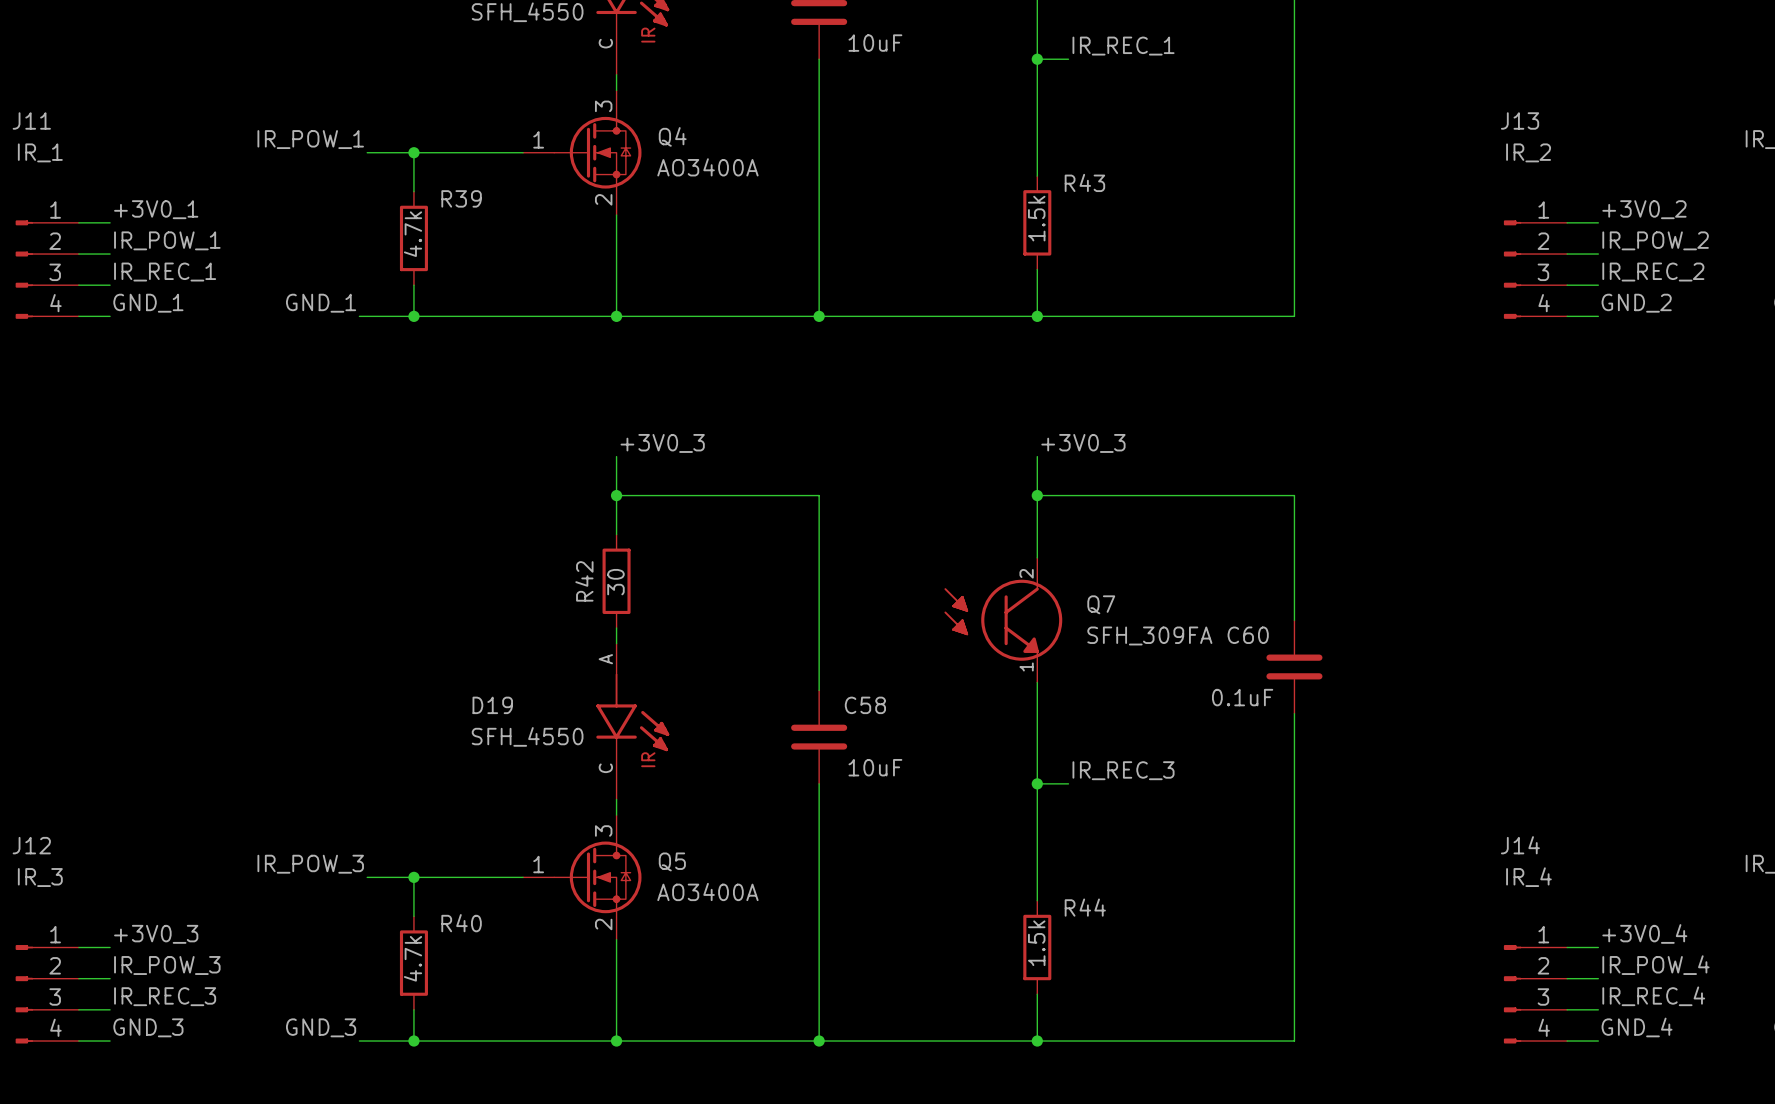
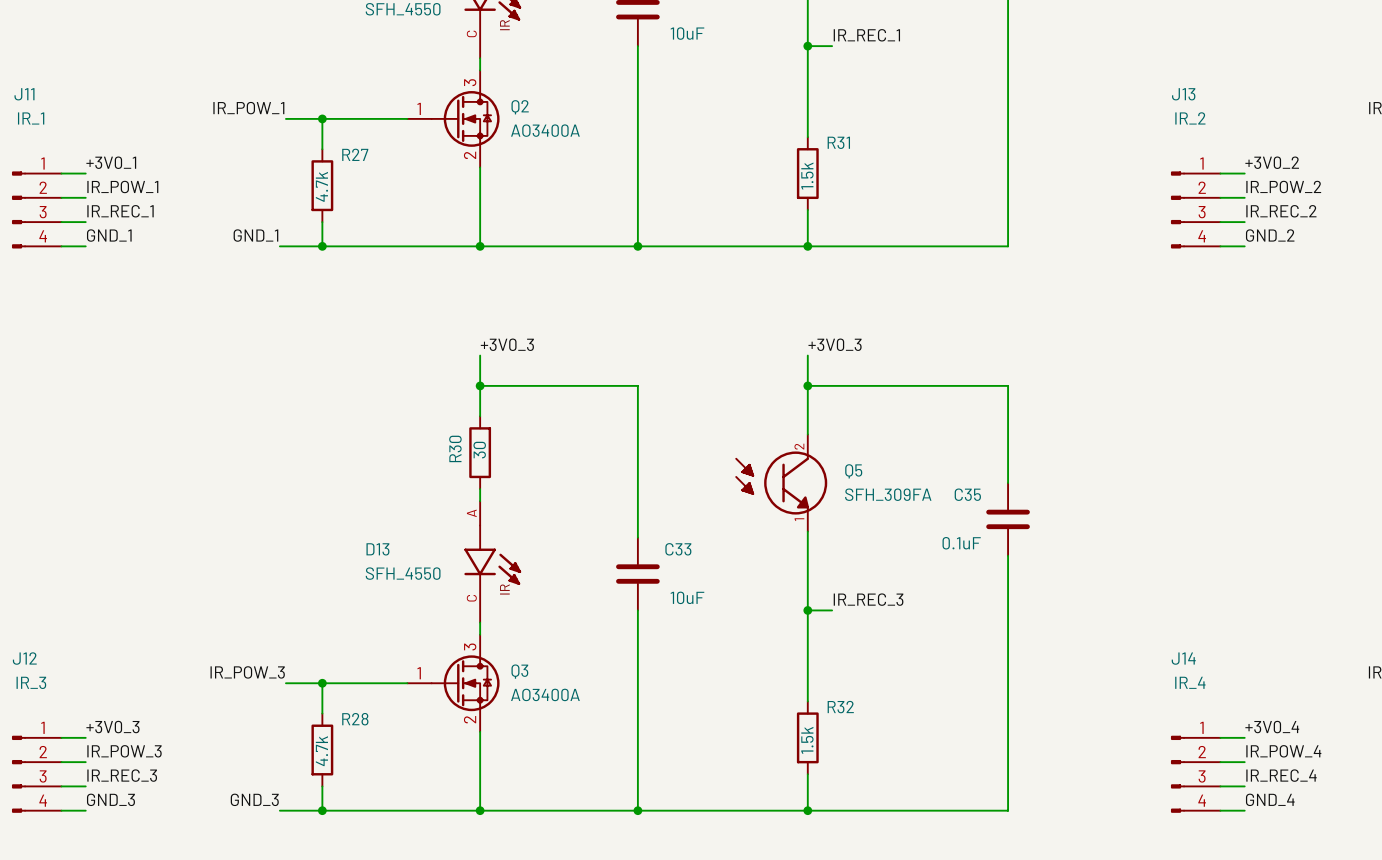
Q4 name: Q4 (672, 136) -> Q2 (520, 107)
R43 name: R43 (1084, 182) -> R31 (838, 142)
R39 name: R39 (461, 198) -> R27 (355, 154)
R42 name: R42 (584, 581) -> R30 (455, 448)
Q7 name: Q7 (1101, 604) -> Q5 (853, 471)
C60 name: C60 (1248, 635) -> C35 (967, 494)
D19 name: D19 (492, 705) -> D13 (377, 549)
C58 name: C58 (865, 705) -> C33 (678, 549)
Q5 name: Q5 (672, 861) -> Q3 (519, 671)
R44 name: R44 (1085, 907) -> R32 (840, 707)
R40 name: R40 (461, 923) -> R28 (355, 719)

